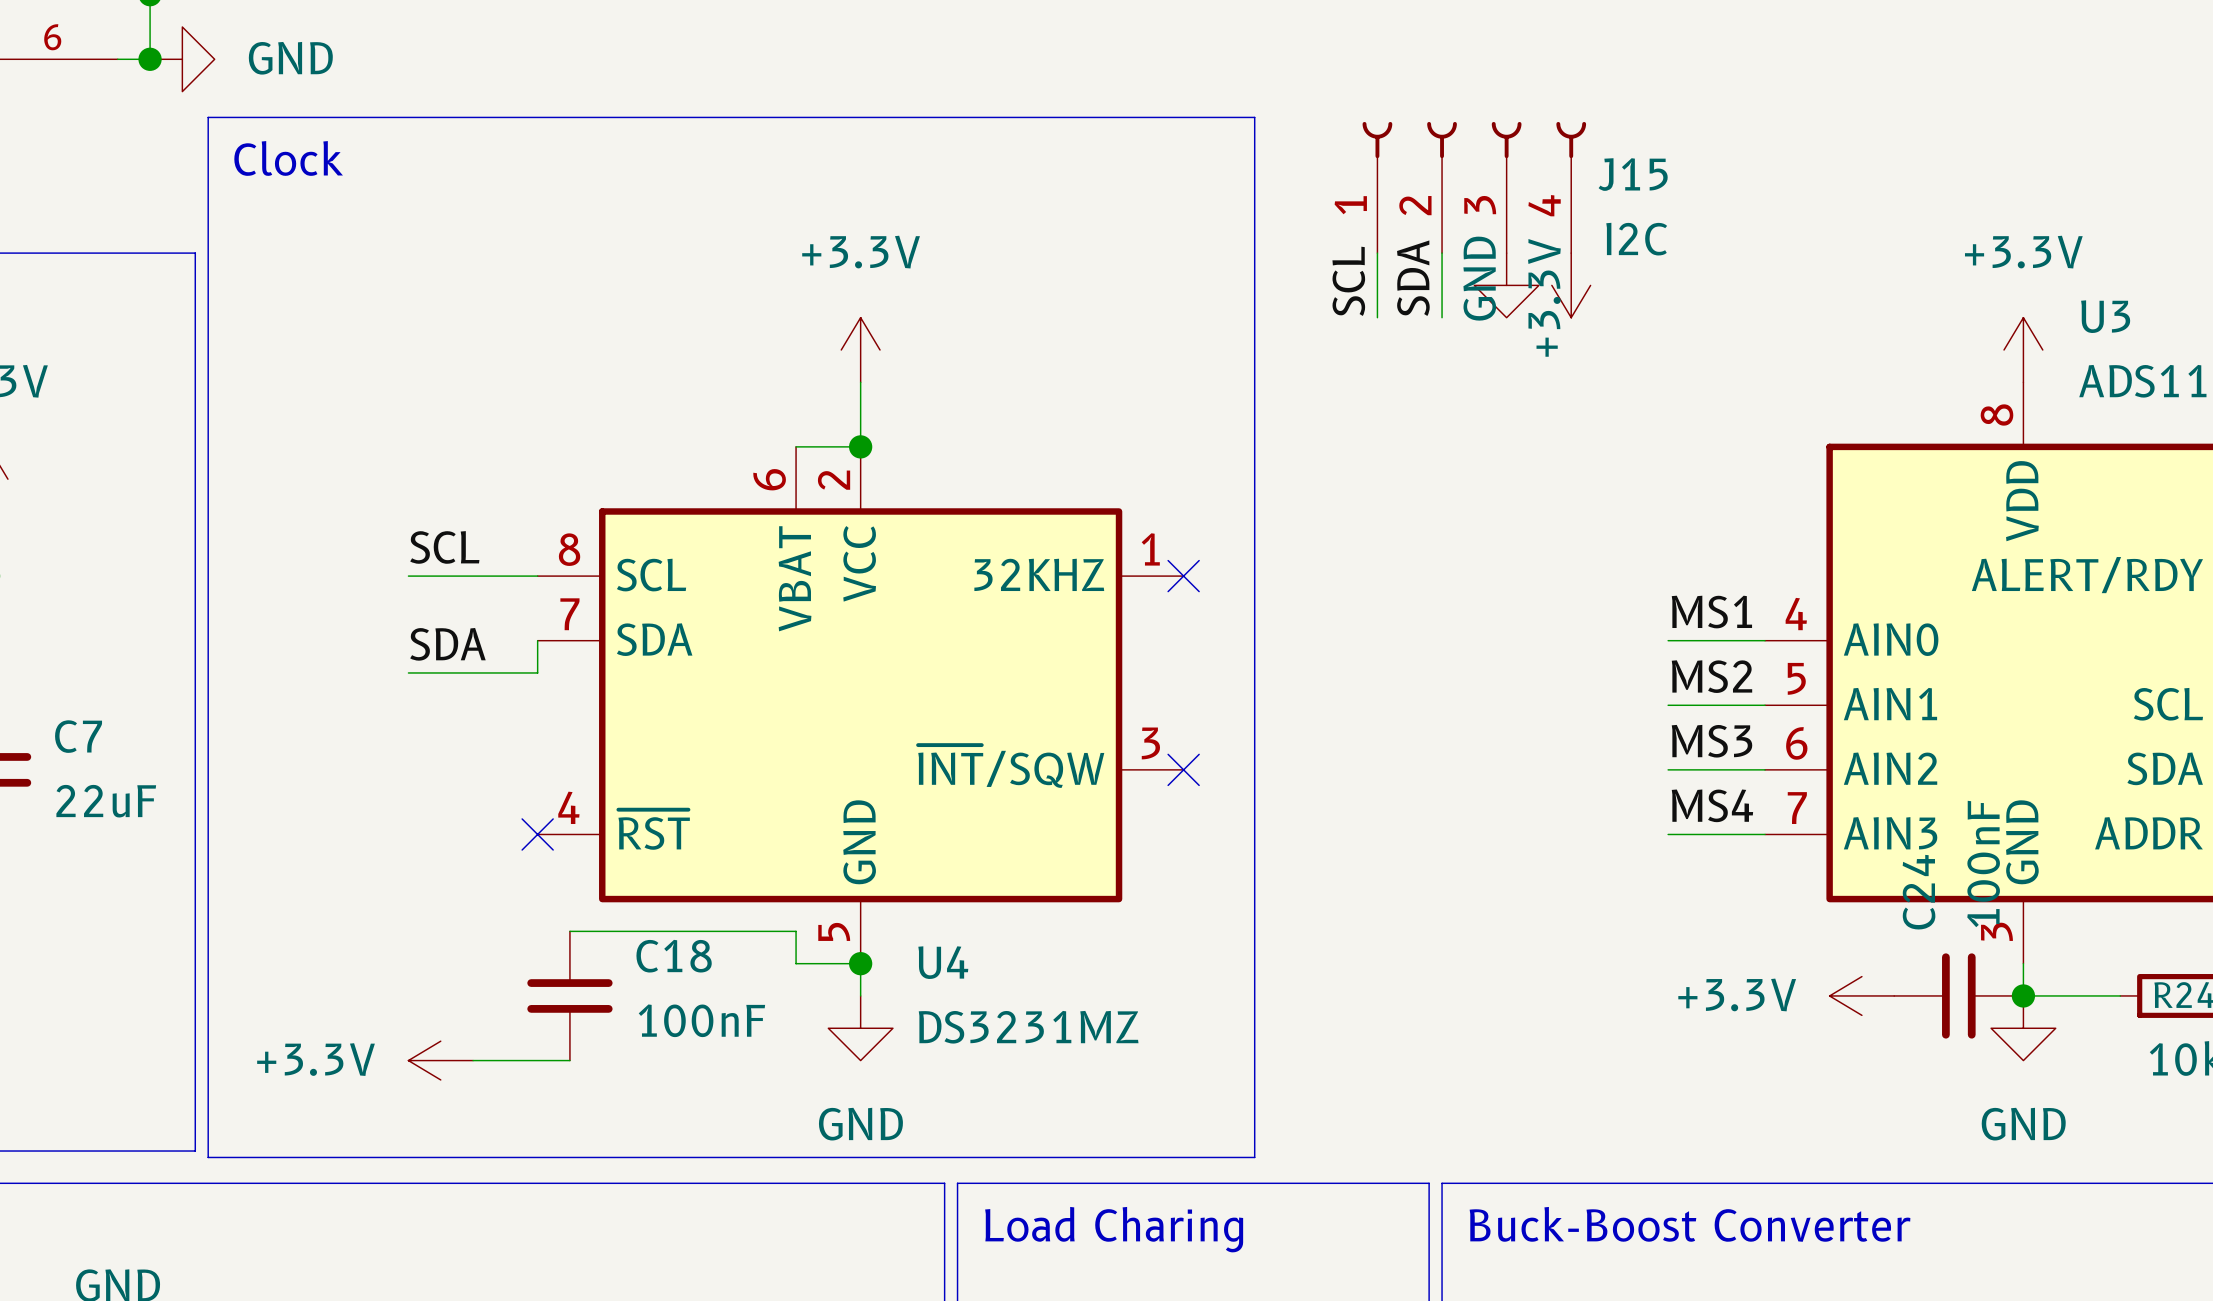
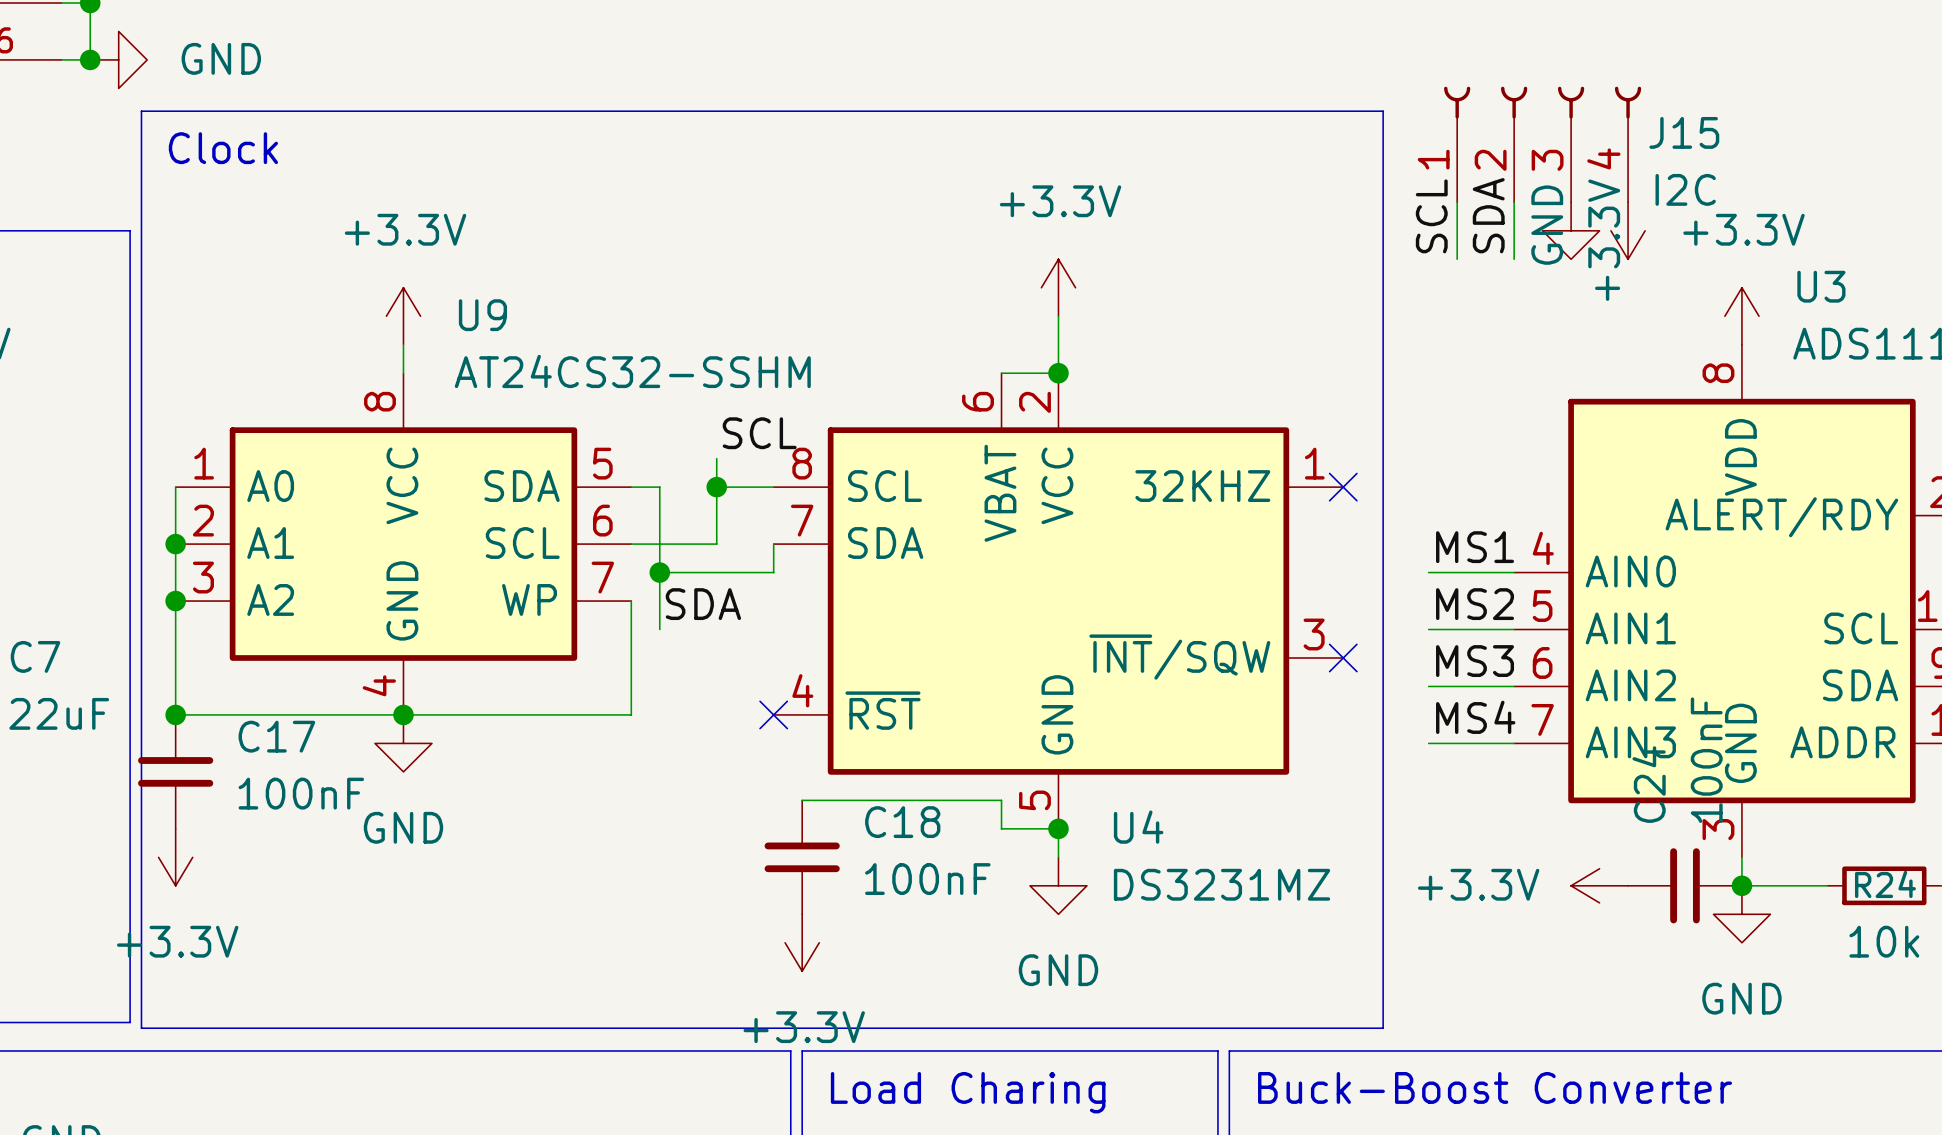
line: (1254, 117) (1254, 1157) -> (1064, 111) (1383, 111) (1383, 1028) (1064, 1028)
J15 position: (1474, 187) -> (1542, 144)
label: none -> SCL (1431, 216)
wire: (1377, 253) (1377, 317) -> (1514, 202) (1514, 259)
wire: (1442, 253) (1442, 317) -> (1457, 202) (1457, 259)
power symbol: none -> +3.3V (1628, 230)
label position: SDA (1413, 278) -> SDA (1488, 215)
label: SCL (1348, 281) -> none
power symbol position: GND (1506, 285) -> GND (1571, 230)
power symbol: +3.3V (1571, 285) -> none
power symbol: none -> +3.3V (1058, 287)
power symbol: none -> +3.3V (403, 316)
power symbol: +3.3V (860, 349) -> none
wire: none -> (403, 344) (403, 373)
wire: (860, 382) (860, 446) (796, 446) -> (1058, 316) (1058, 373) (1001, 373)
junction: none -> (1058, 373)
junction position: (860, 446) -> (716, 487)
label: none -> SCL (759, 433)
wire: none -> (175, 487) (175, 714) (631, 714) (631, 601)
no-connect mark: none -> (1343, 487)
label: SCL (444, 547) -> none
no-connect mark: (1183, 576) -> none
junction: none -> (175, 544)
U9: none -> AT24CS32-SSHM (403, 544)
junction: none -> (659, 572)
label: SDA (447, 644) -> none
junction: none -> (175, 601)
label: none -> SDA (703, 604)
U4 position: (860, 705) -> (1058, 601)
no-connect mark: none -> (1343, 657)
no-connect mark: (1183, 769) -> none
junction: none -> (175, 714)
junction: none -> (403, 714)
no-connect mark: none -> (773, 714)
power symbol: none -> GND (403, 743)
no-connect mark: (537, 834) -> none
C17: none -> 100nF (175, 771)
wire: (569, 931) (796, 931) (796, 963) (860, 963) (860, 995) -> (802, 800) (1001, 800) (1001, 828) (1058, 828) (1058, 857)
junction: none -> (1058, 828)
junction: (860, 963) -> none
C18 position: (569, 995) -> (802, 857)
power symbol: none -> GND (1058, 885)
power symbol: GND (860, 1028) -> none
power symbol text position: +3.3V (316, 1059) -> +3.3V (177, 941)
power symbol rotation: 0° (440, 1060) -> 90° counterclockwise (175, 857)
power symbol position: +3.3V (440, 1060) -> +3.3V (175, 857)
wire: (473, 1060) (569, 1060) -> none
power symbol: none -> +3.3V (802, 942)

